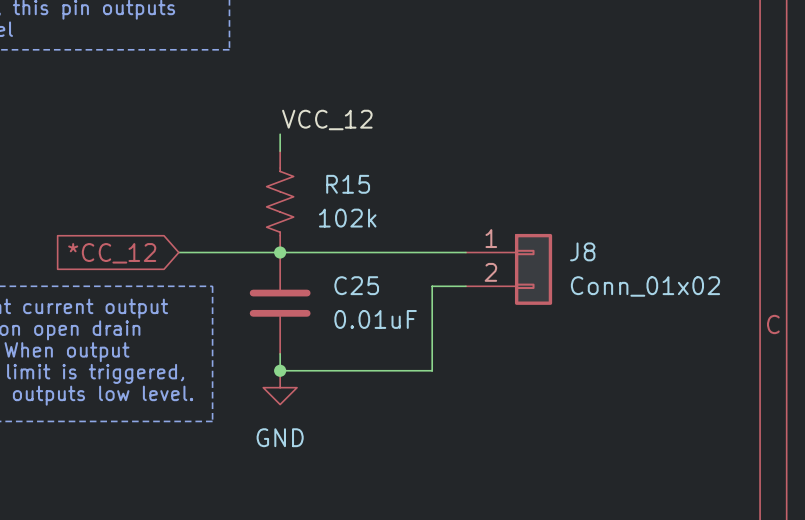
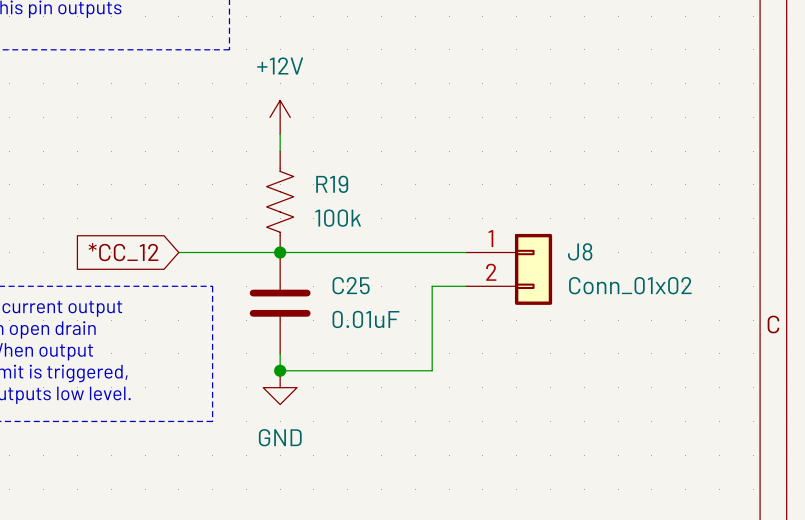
power symbol: none -> +12V (280, 117)
label: VCC_12 (327, 119) -> none
R15 name: R15 (348, 184) -> R19 (332, 184)
R15 value: 102k (347, 218) -> 100k (338, 218)

